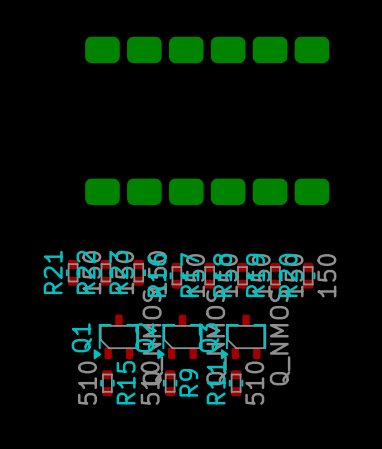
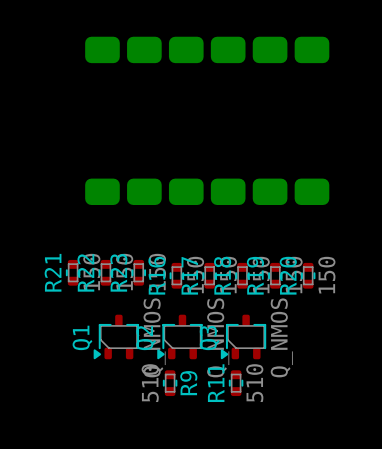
R15: 510 (107, 383) -> none

